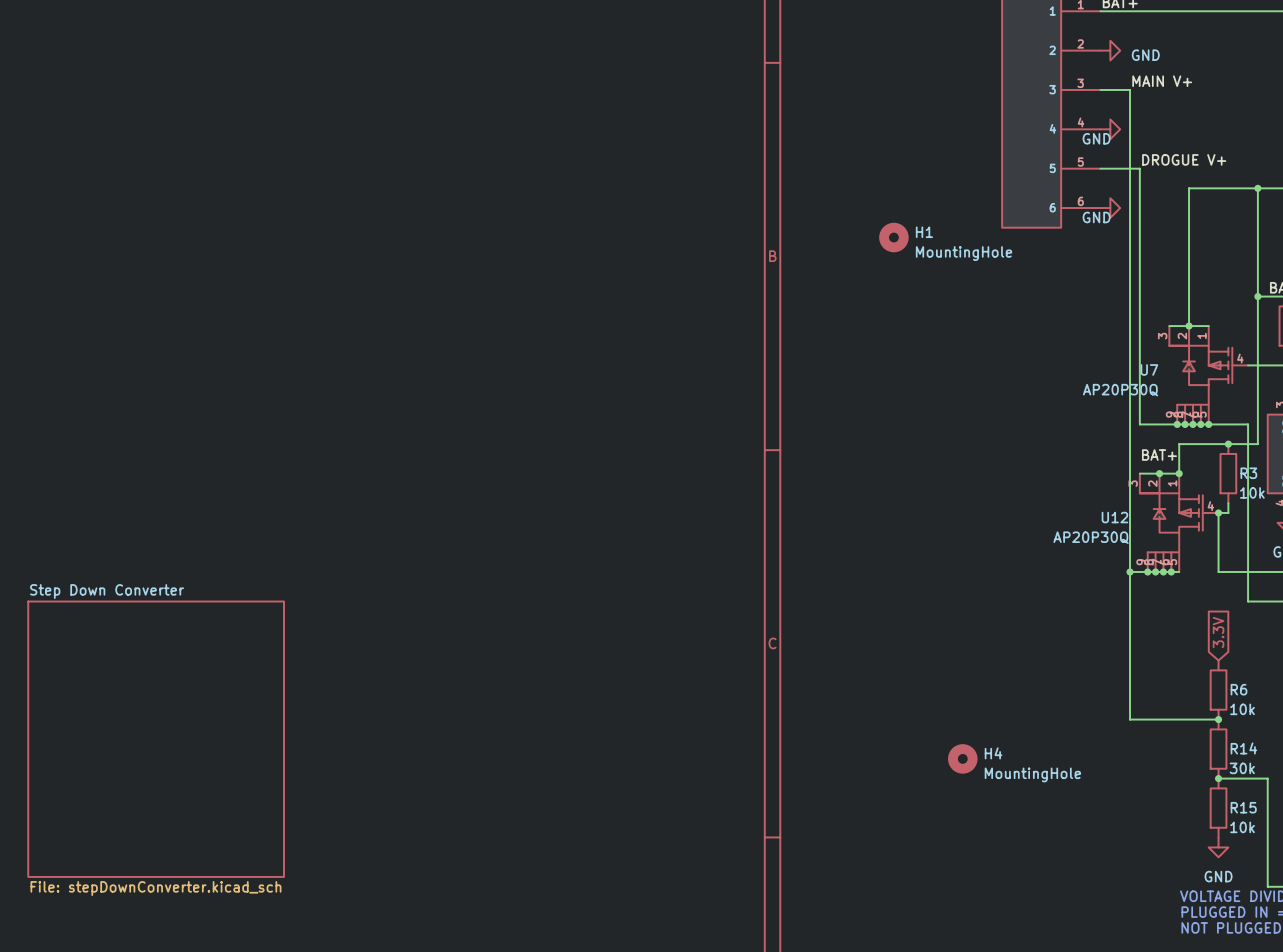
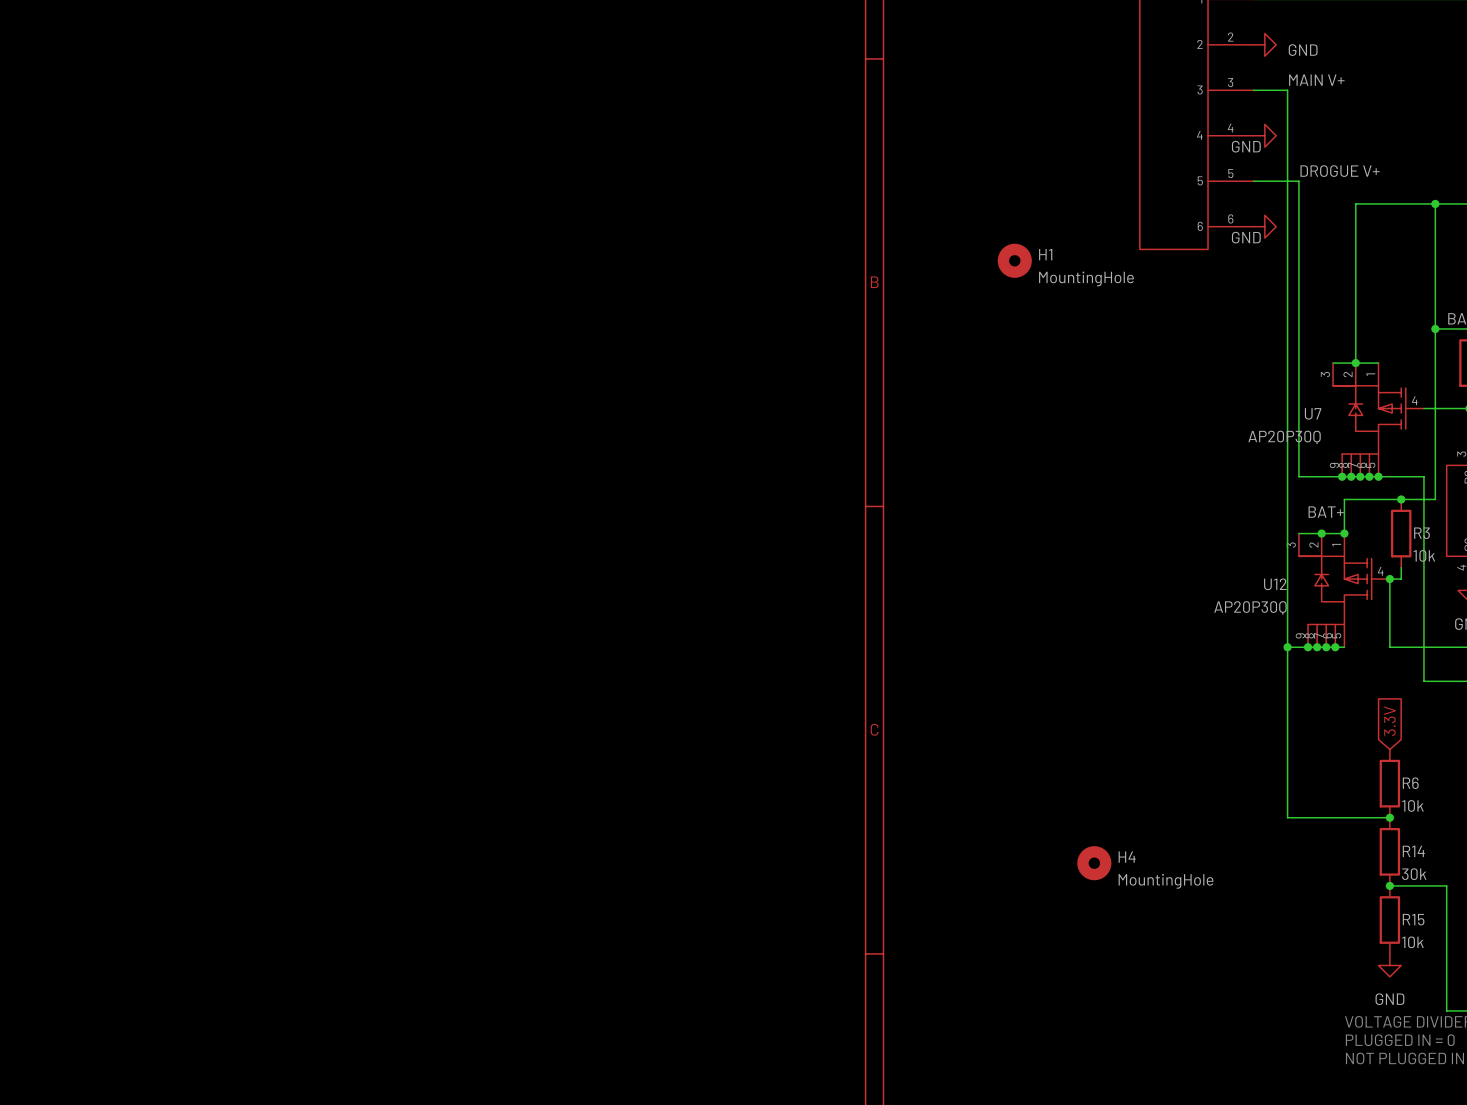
sheet Step Down Converter: File: stepDownConverter.kicad_sch (156, 739) -> none

